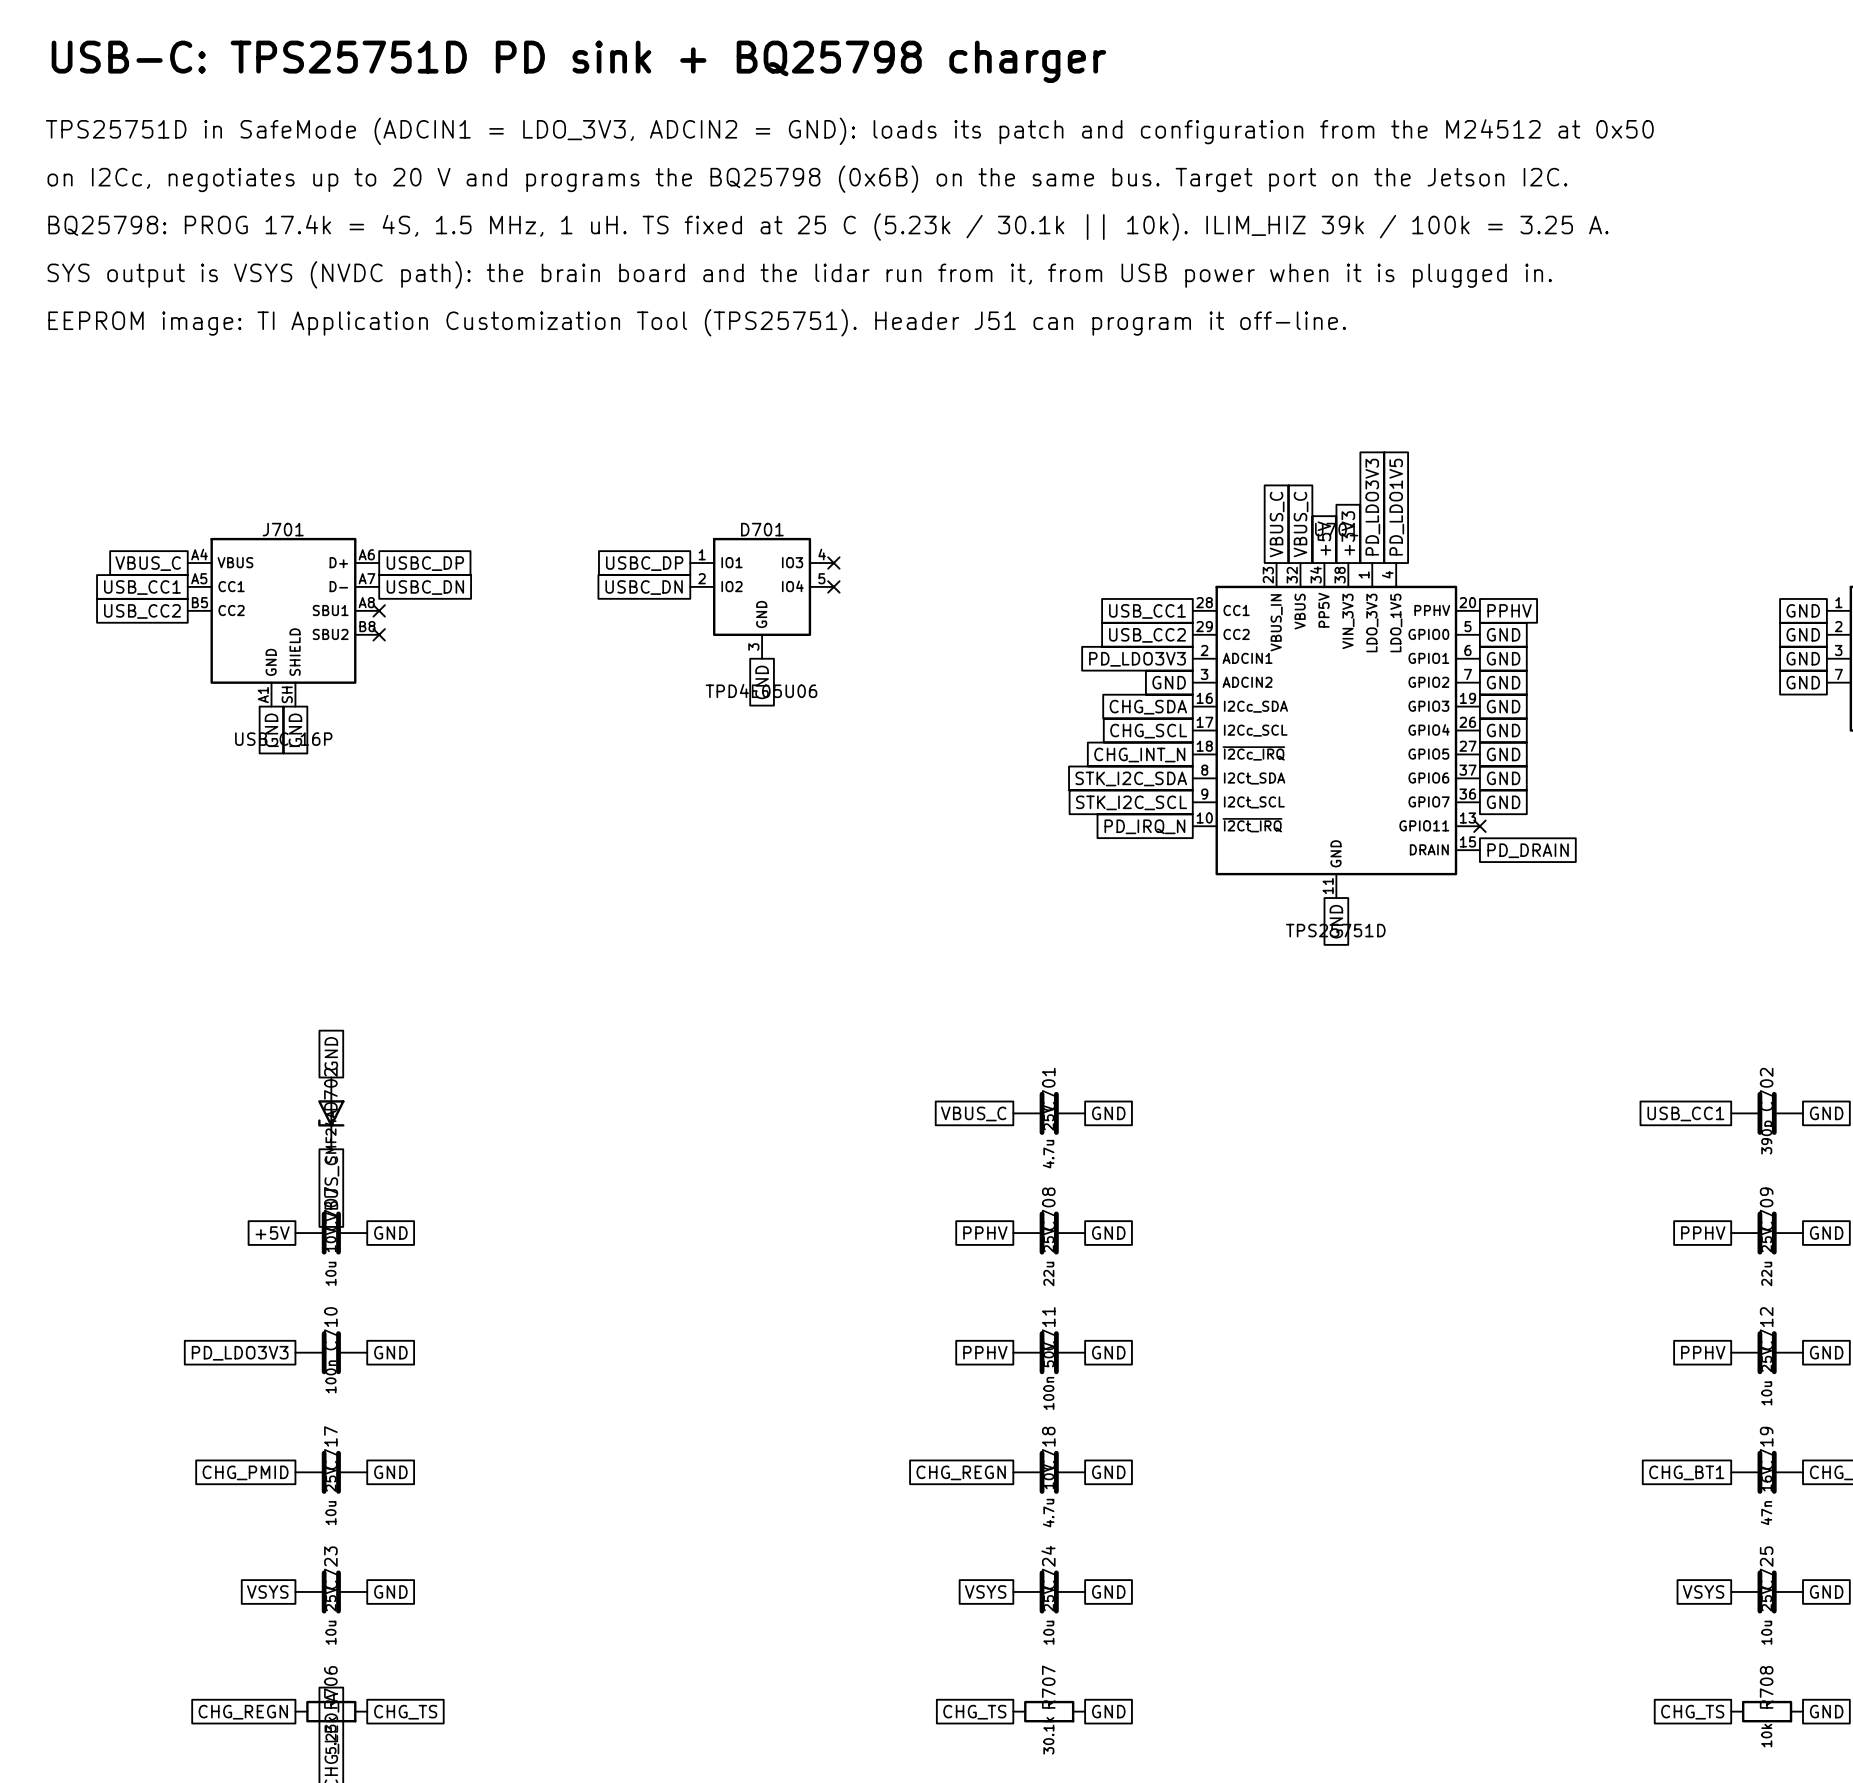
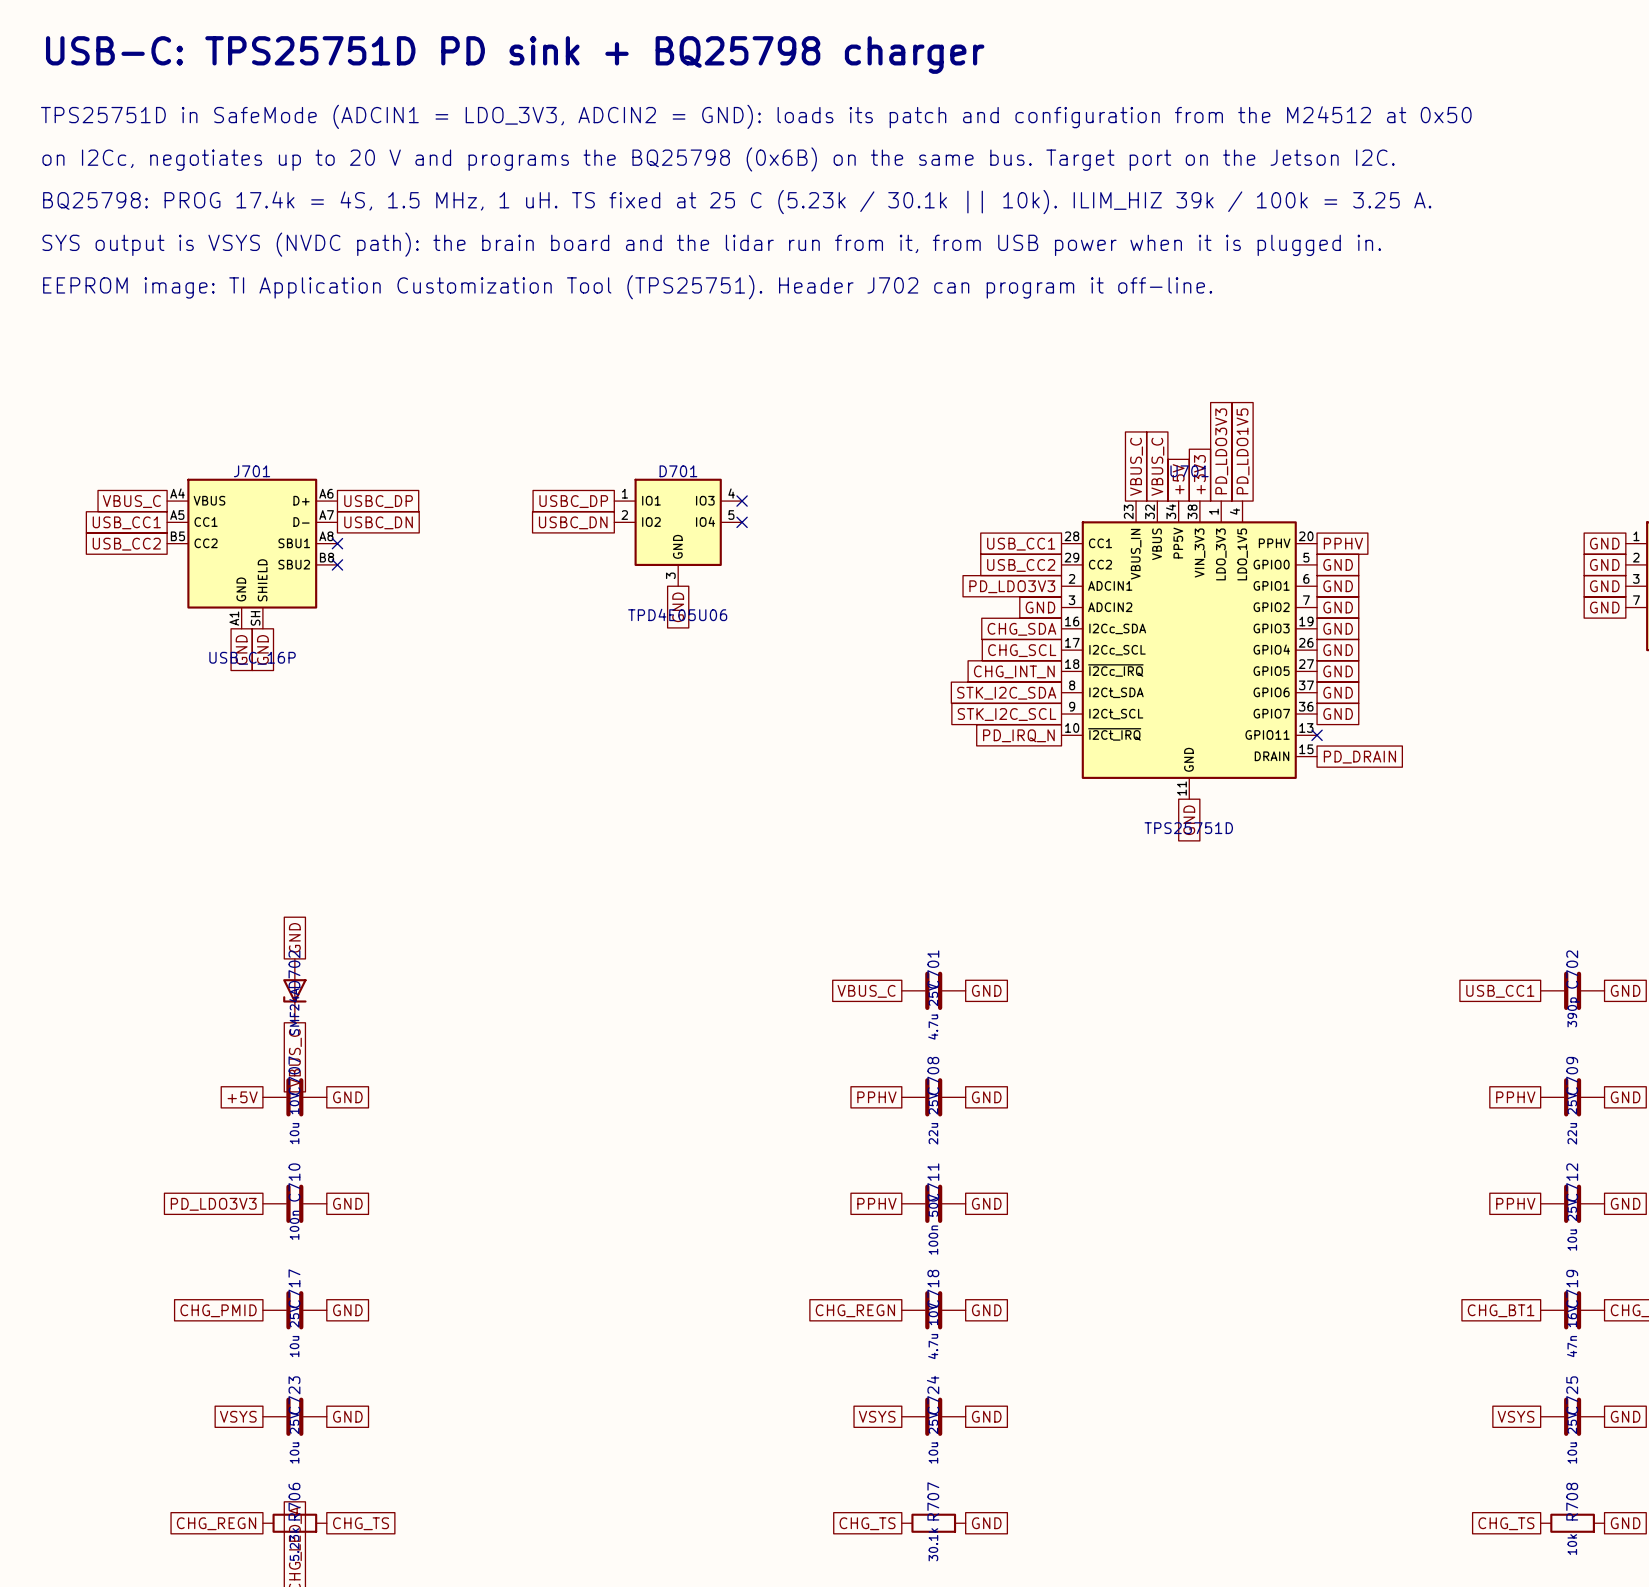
text: EEPROM image: TI Application Customization Tool (TPS25751). Header J51 can program it off-line. (697, 322) -> EEPROM image: TI Application Customization Tool (TPS25751). Header J702 can program it off-line. (627, 287)

